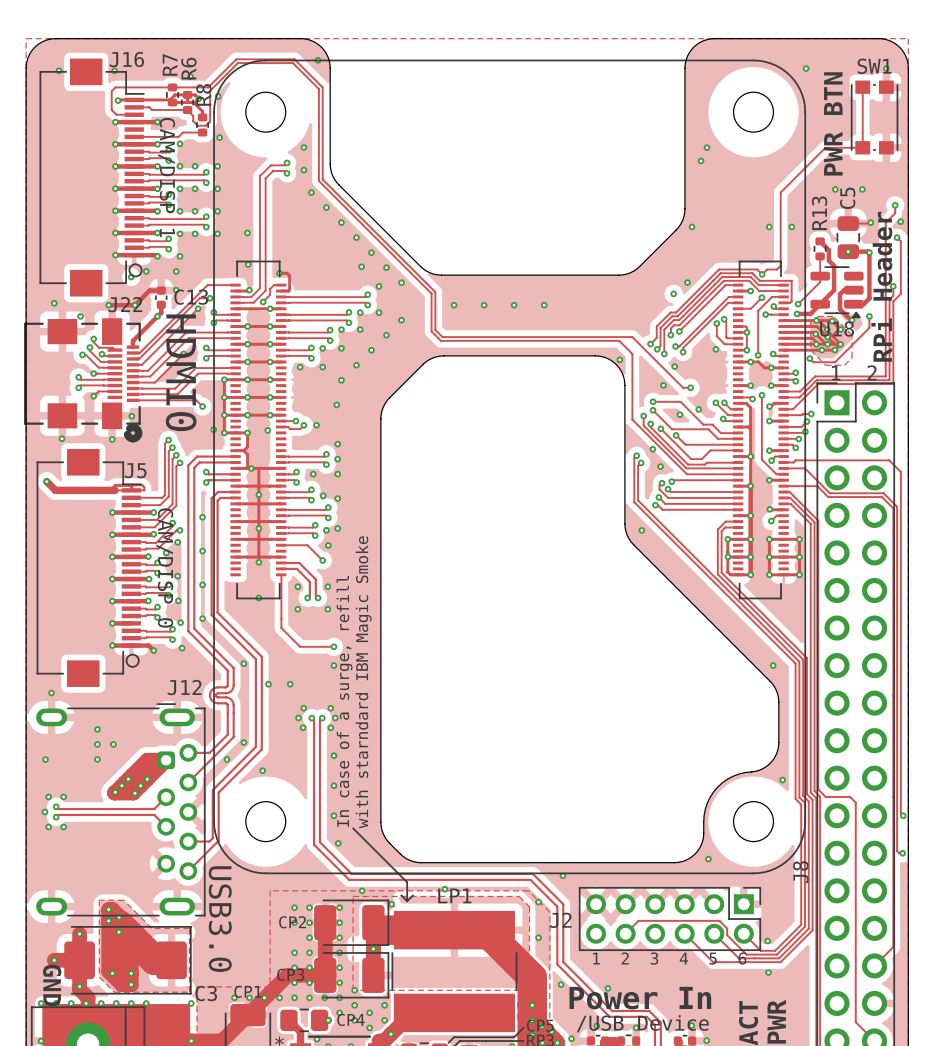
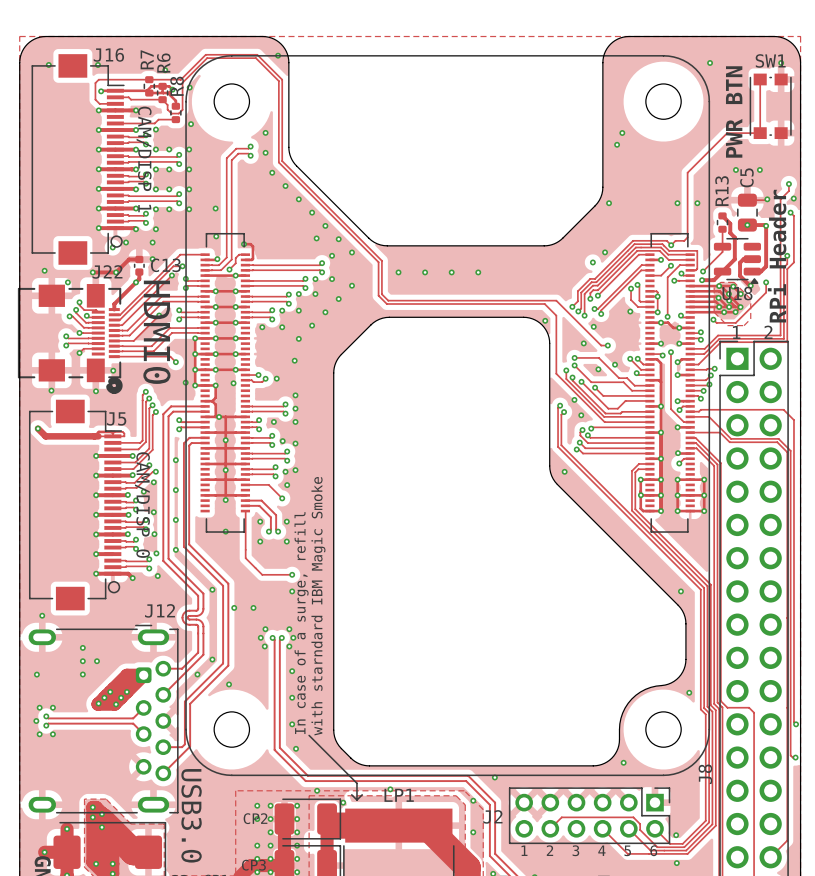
via: (373, 949) -> none

